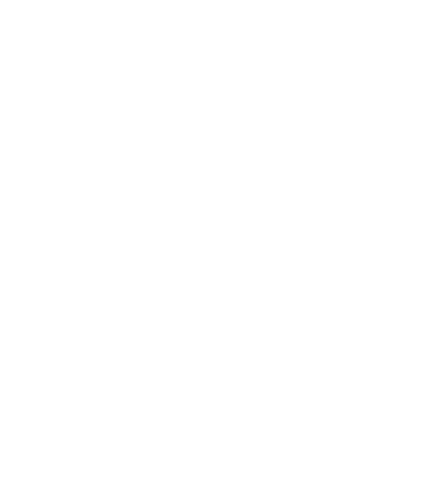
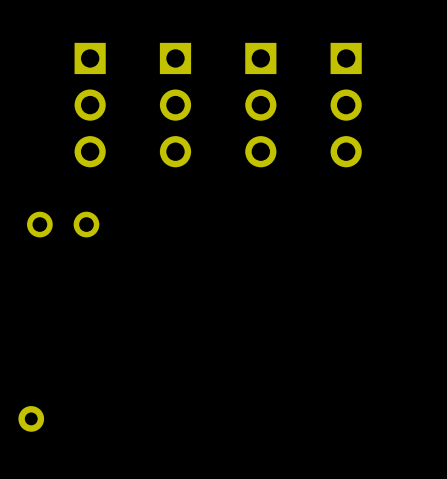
part: none -> (90, 105)
part: none -> (175, 105)
part: none -> (260, 105)
part: none -> (346, 105)
part: none -> (63, 224)
part: none -> (31, 418)

